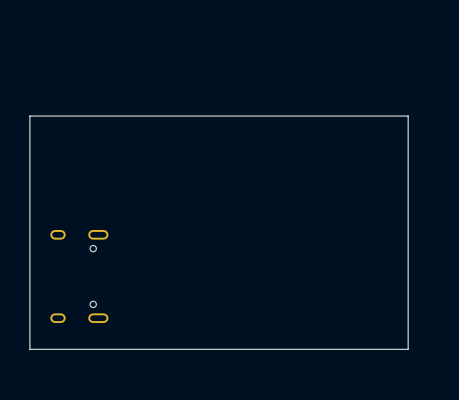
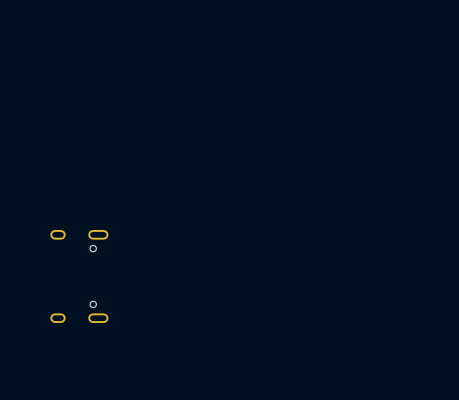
board edge: (408, 116) (29, 116) (29, 349) (408, 349) (408, 116) -> none

